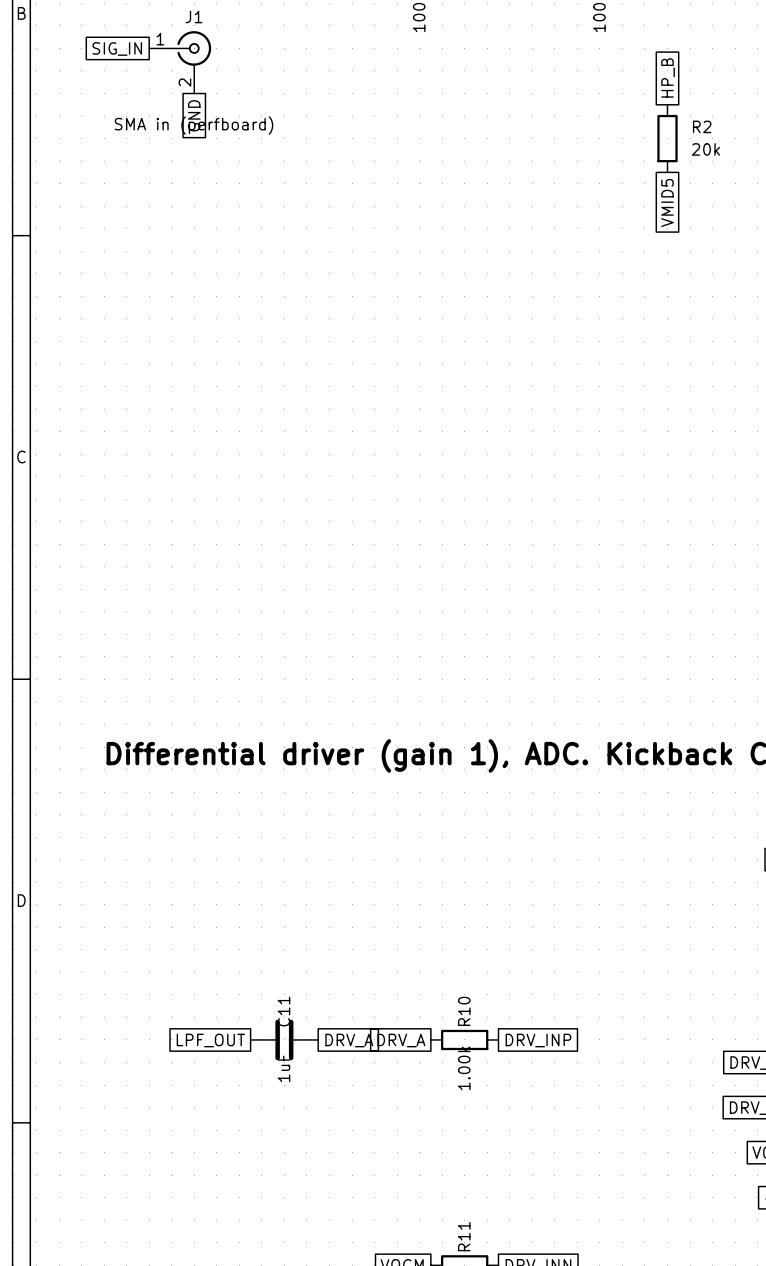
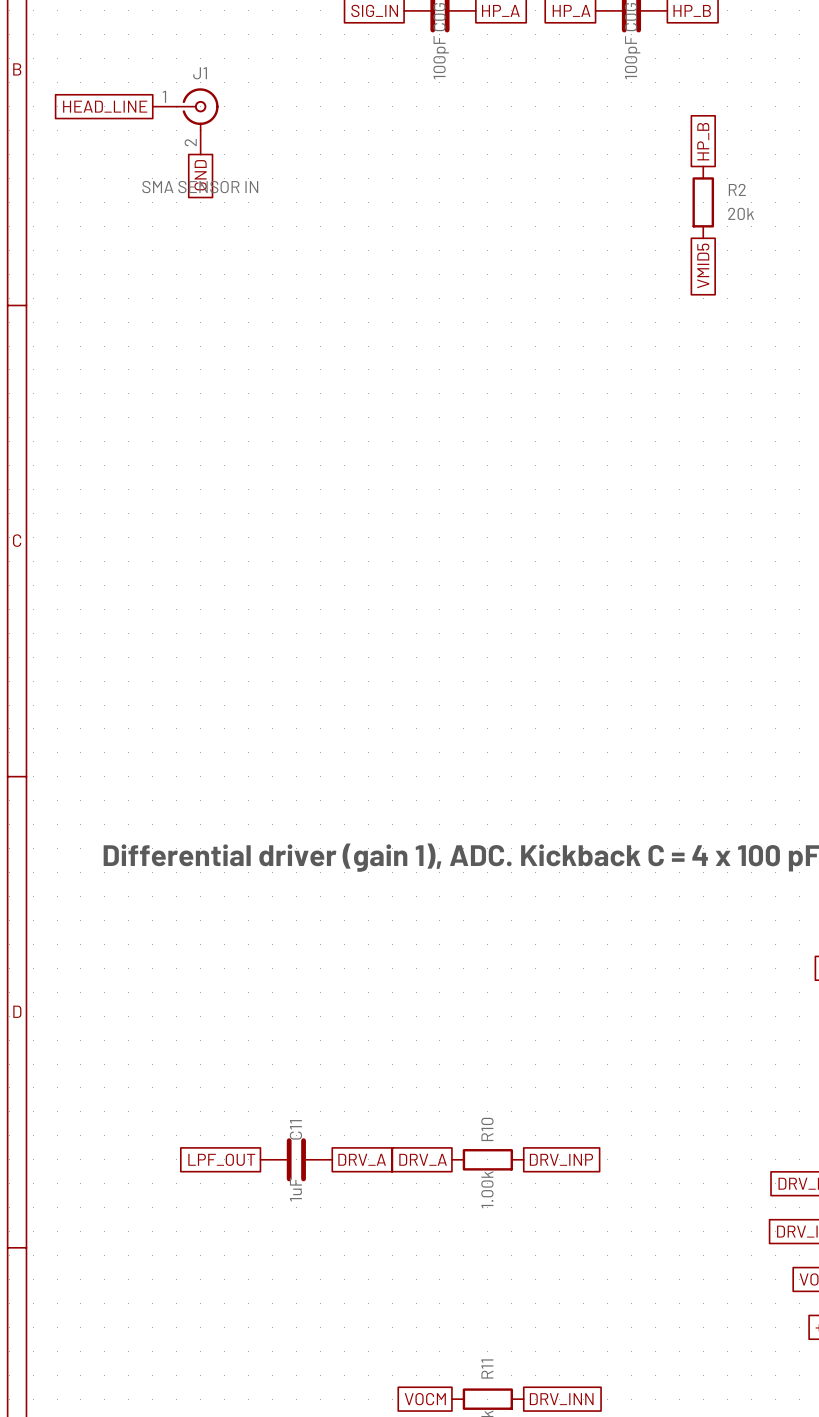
global label: SIG_IN (117, 48) -> HEAD_LINE (105, 106)
J1 value: SMA in (perfboard) (194, 125) -> SMA SENSOR IN (200, 187)

